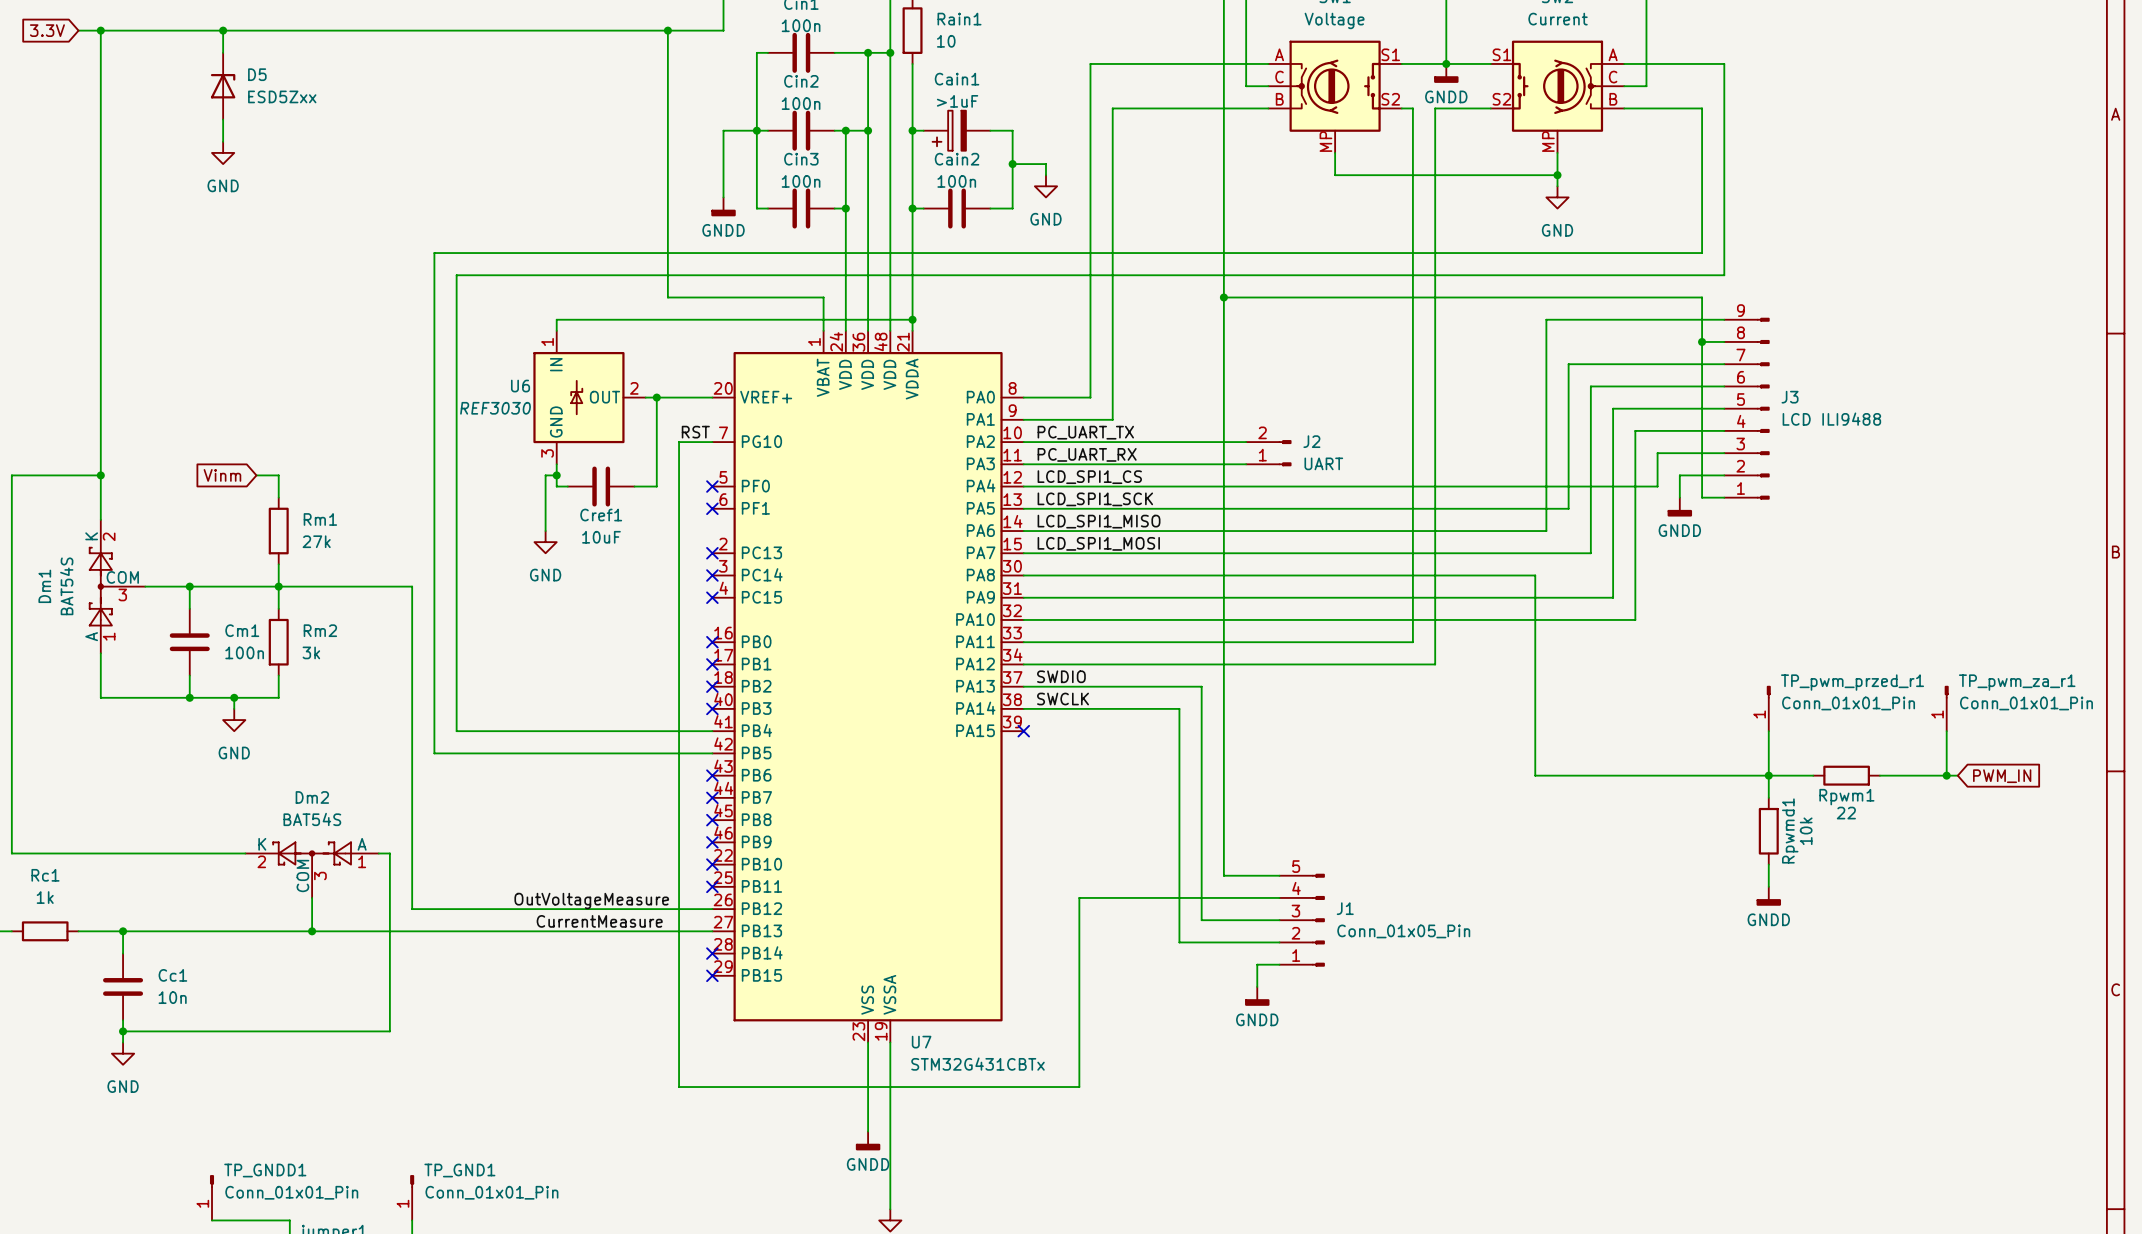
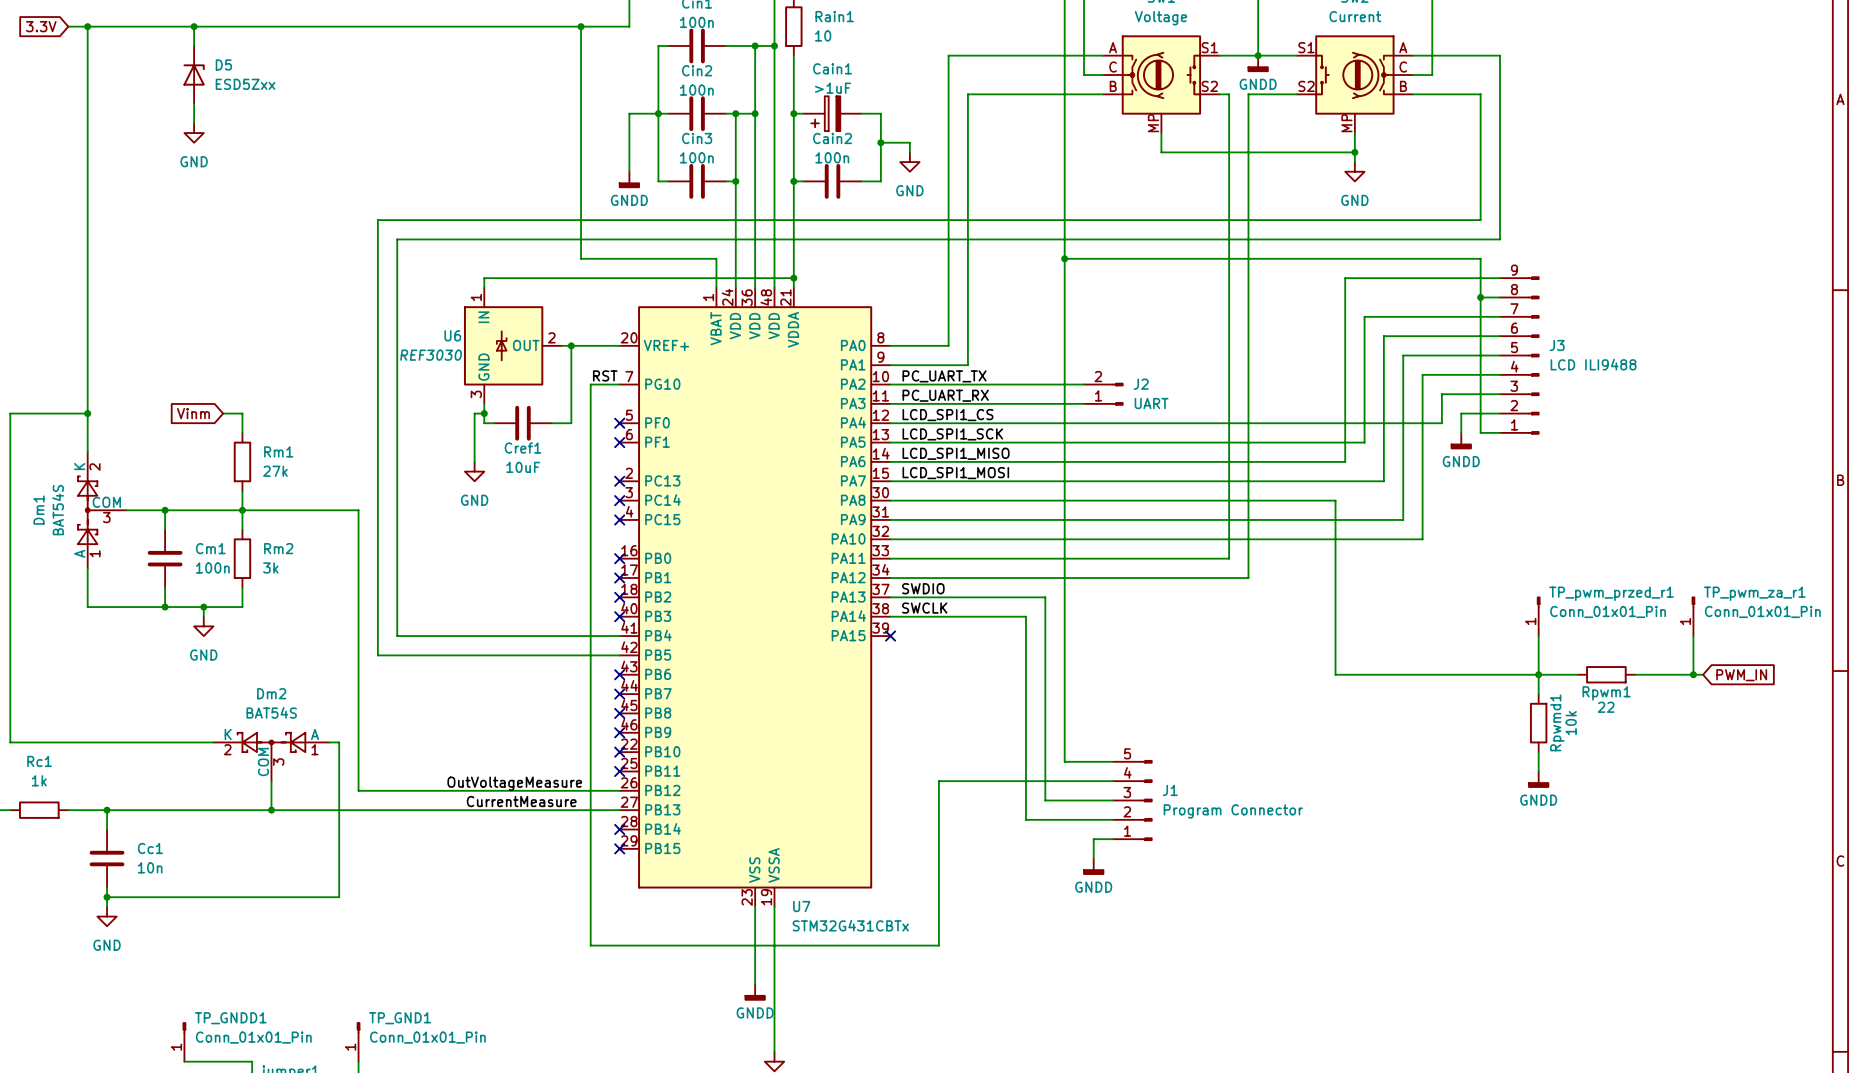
J1 value: Conn_01x05_Pin (1403, 931) -> Program Connector (1233, 811)

